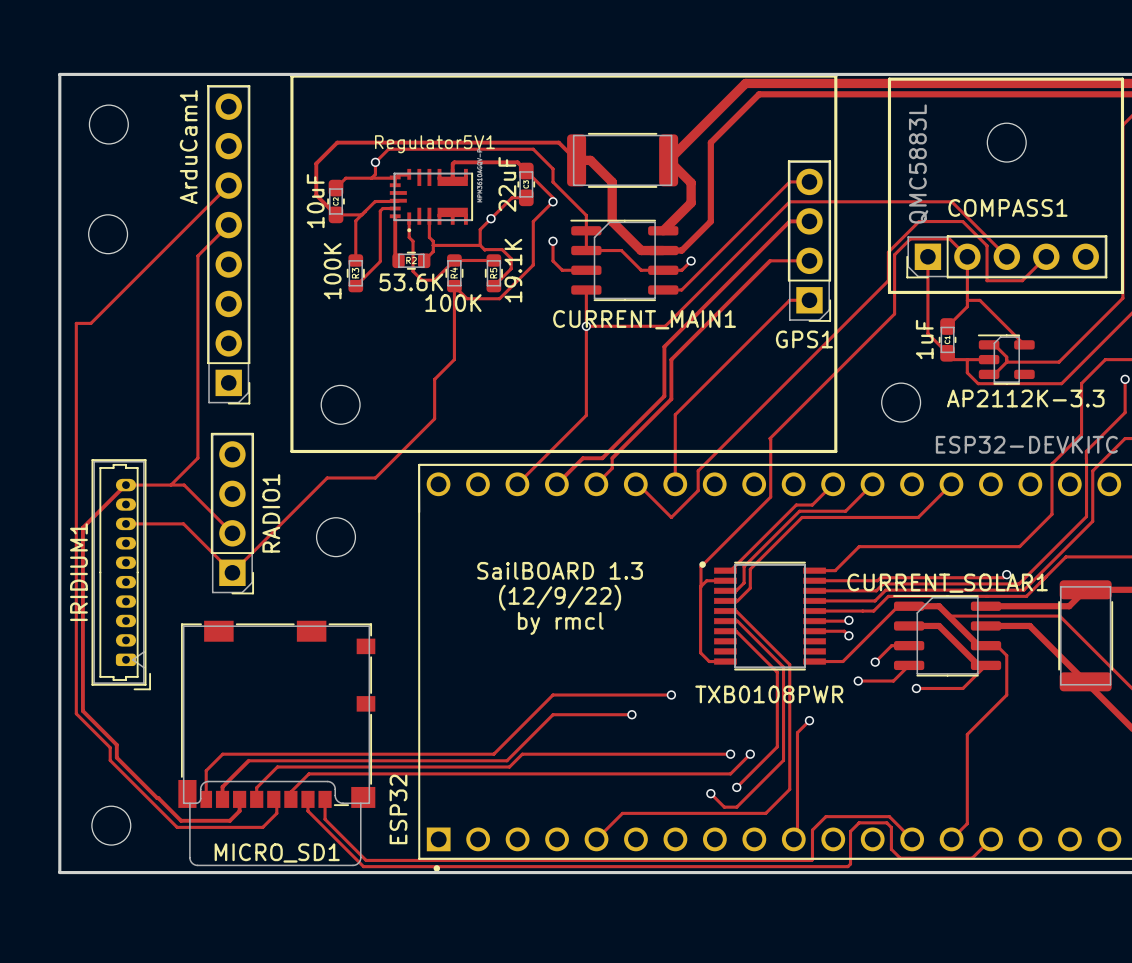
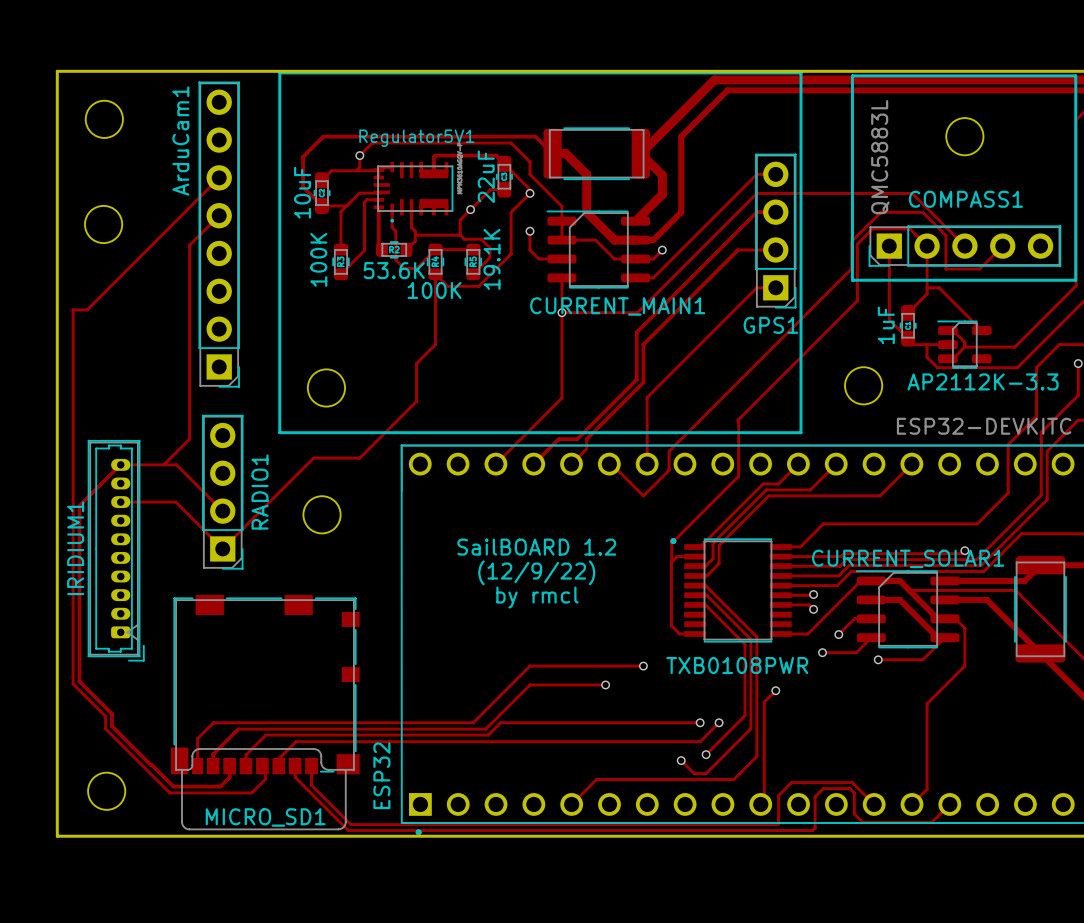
text: SailBOARD 1.3 (560, 570) -> SailBOARD 1.2 (536, 547)

